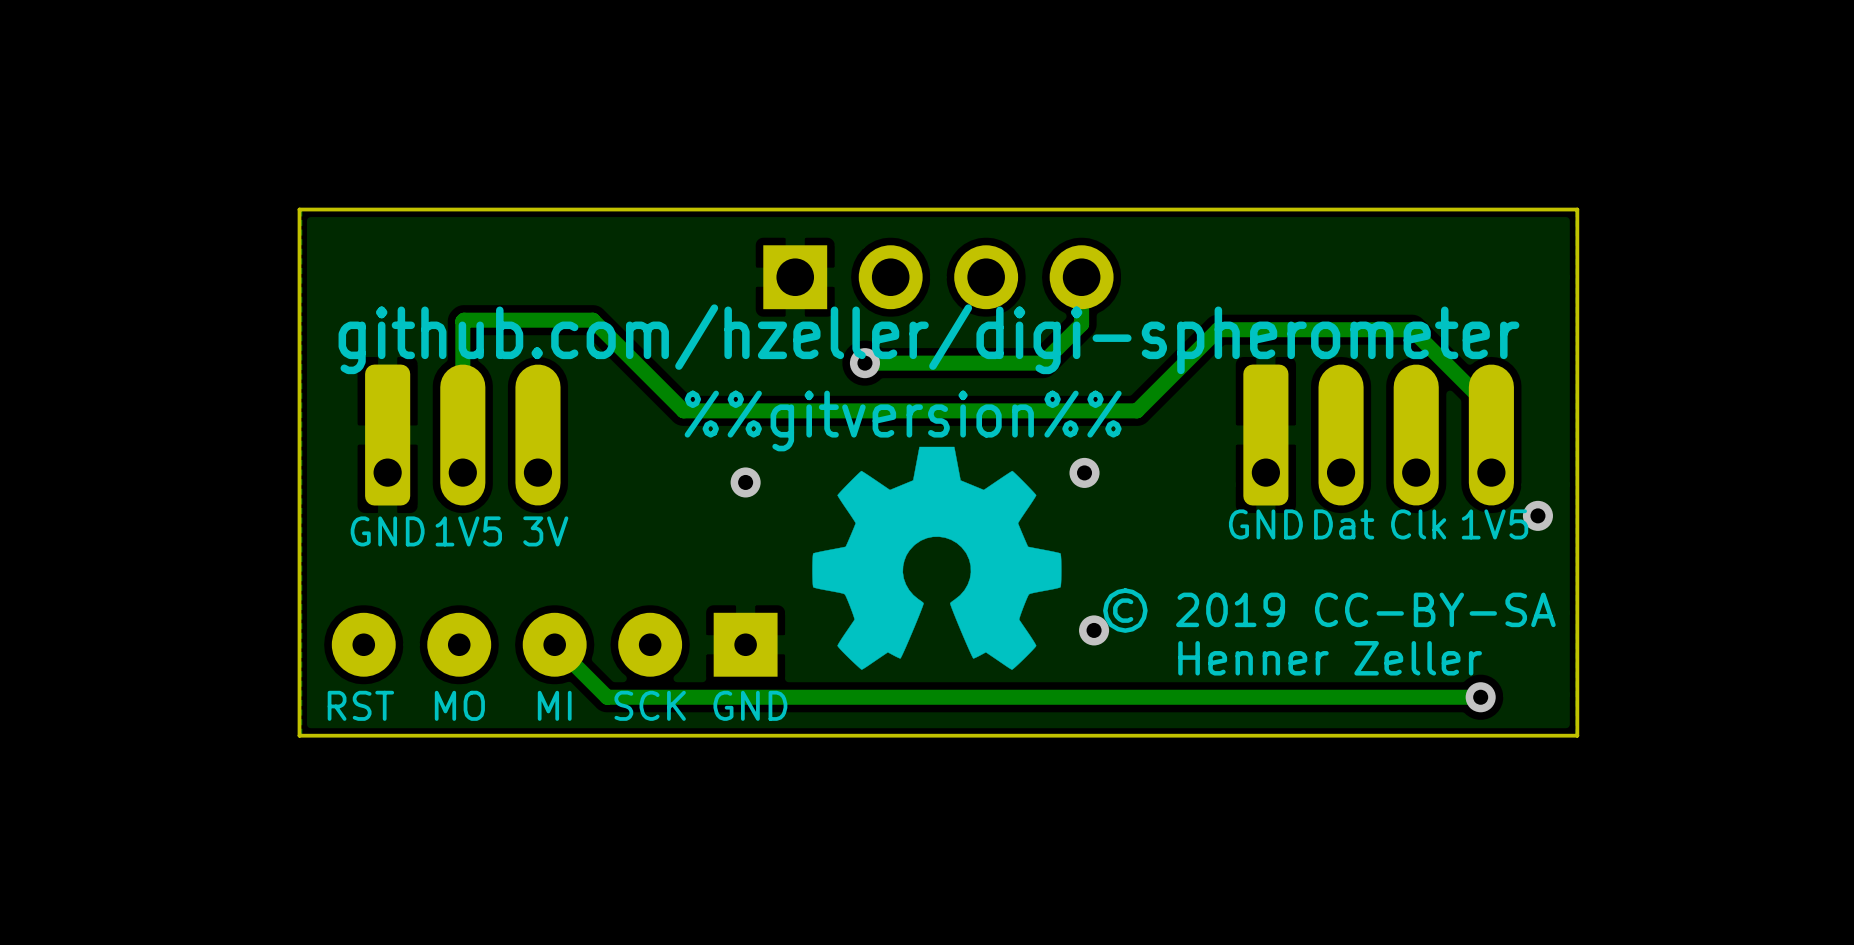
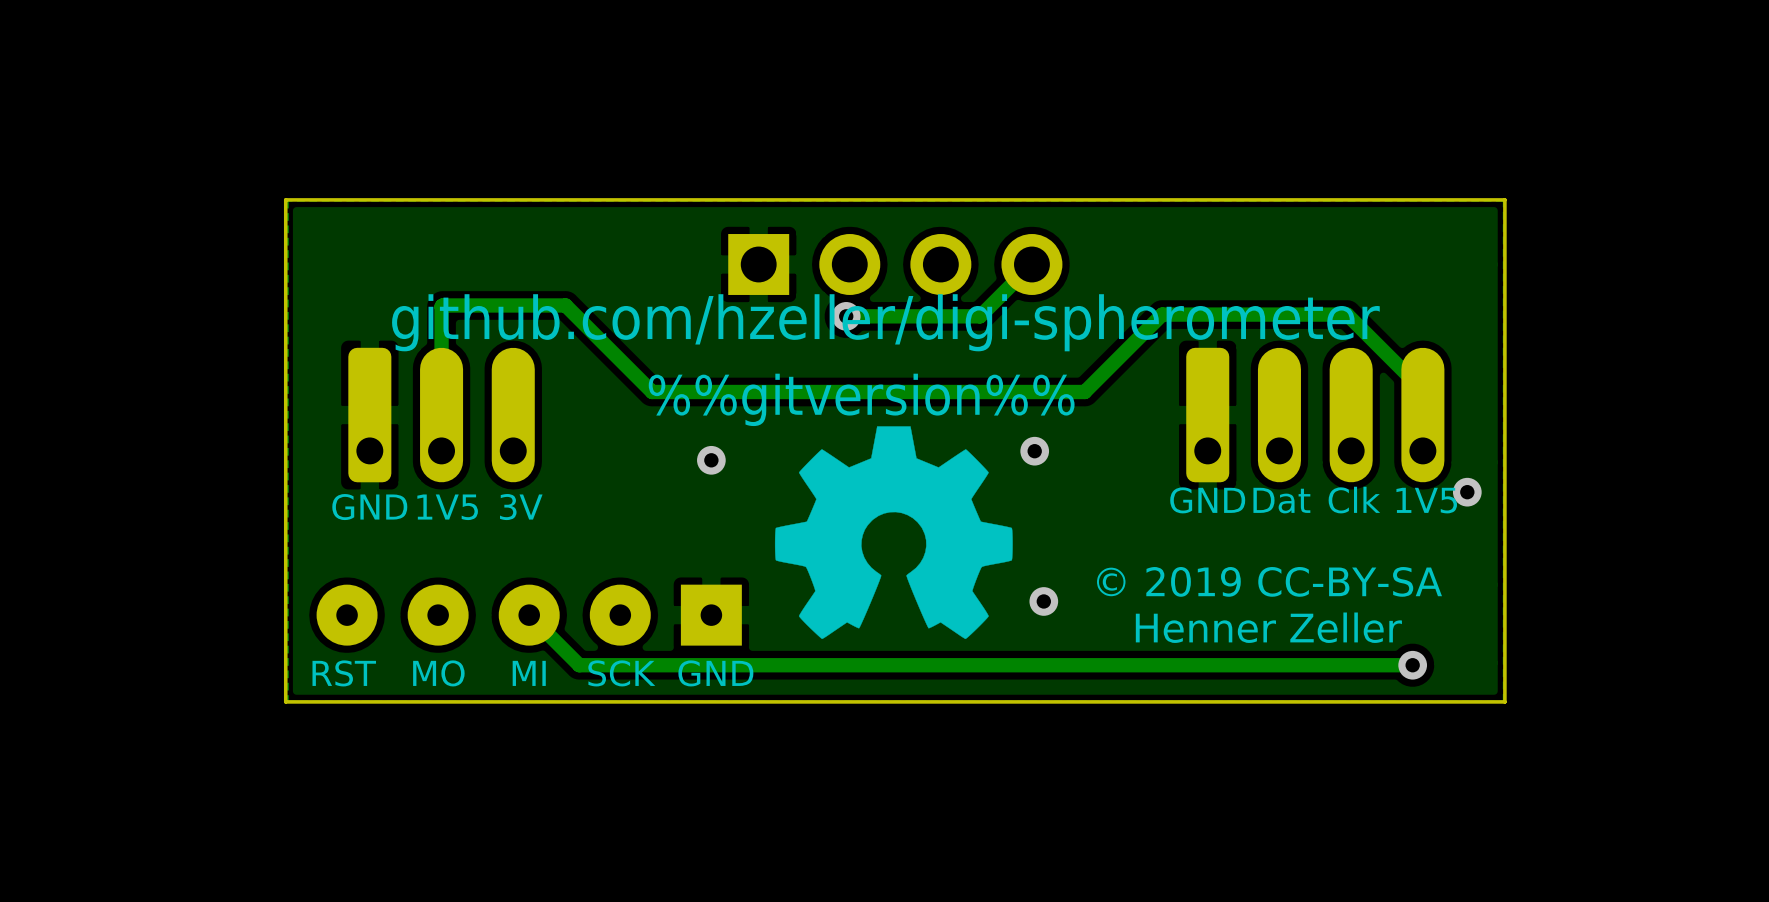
track: (1081, 277) (1081, 324) (1042, 363) (864, 363) -> (1031, 264) (980, 316) (846, 316)
via position: (864, 363) -> (846, 316)

